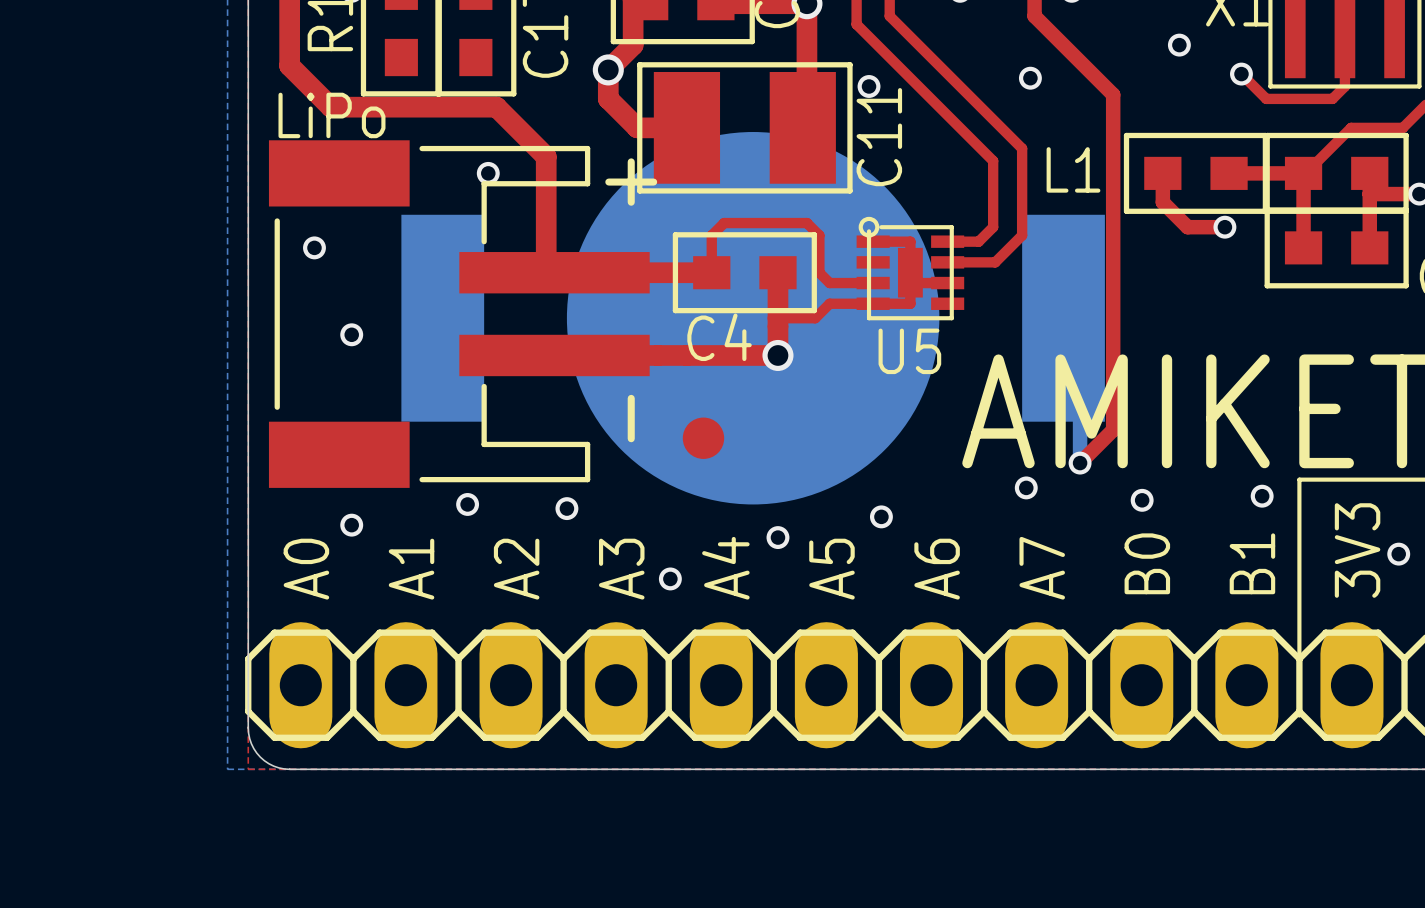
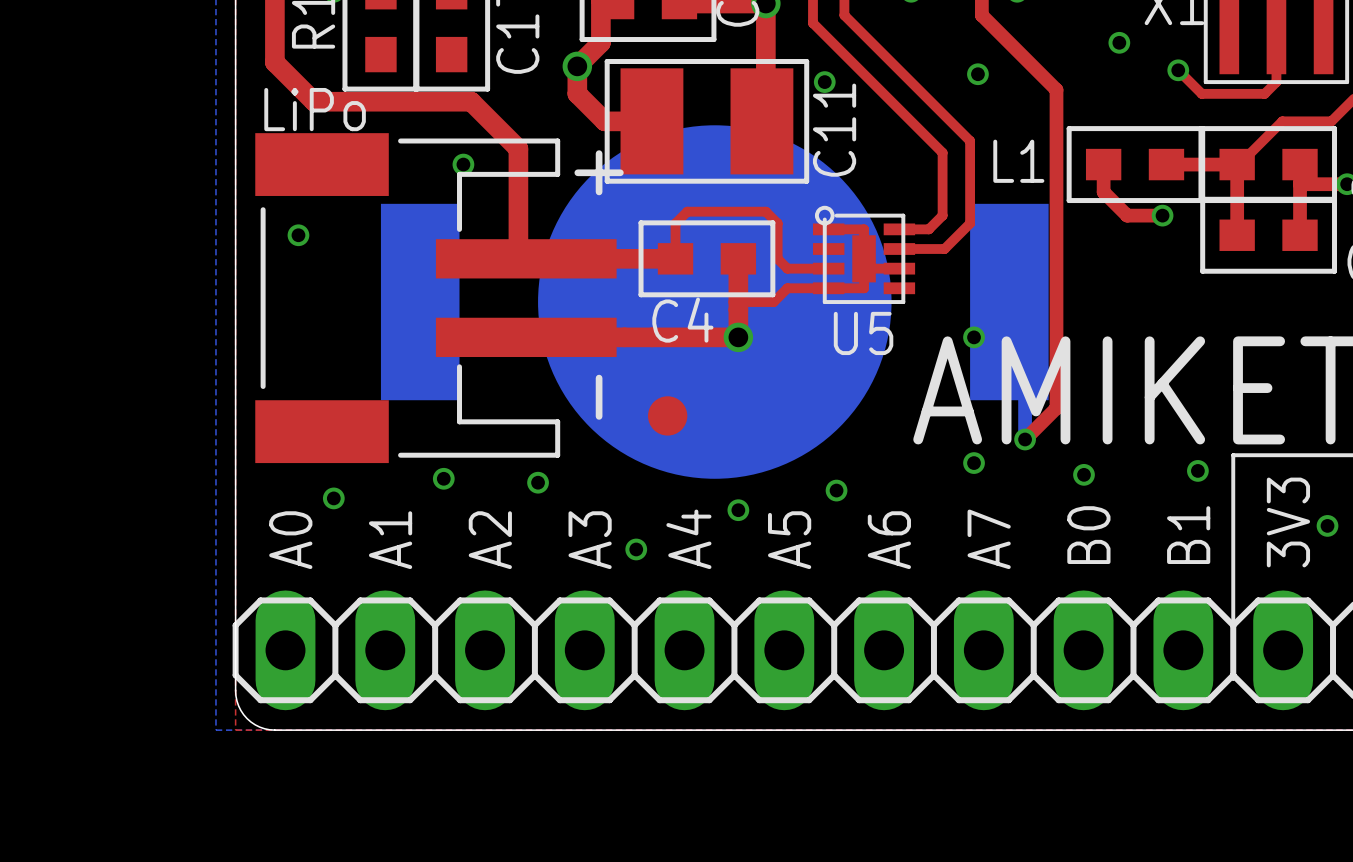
via: (351, 334) -> none
via: none -> (974, 337)

